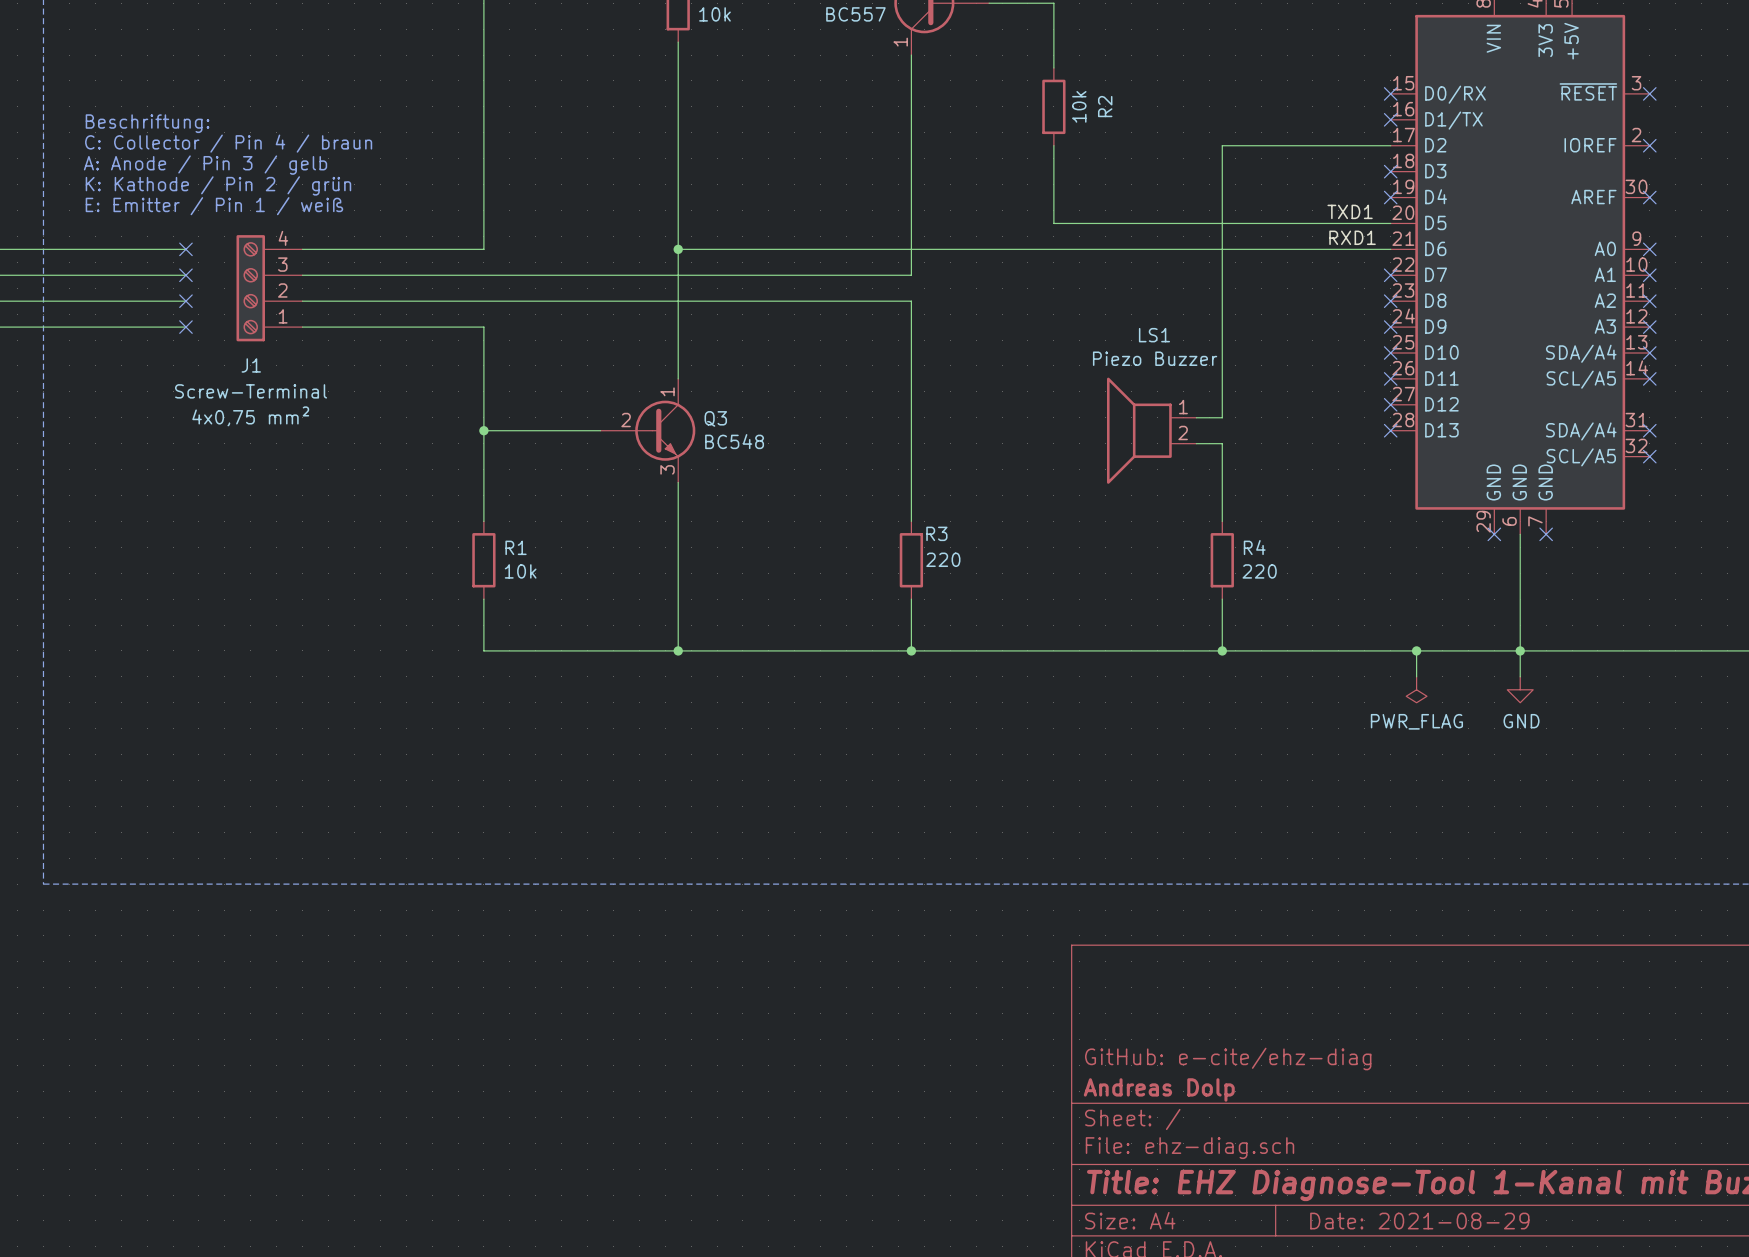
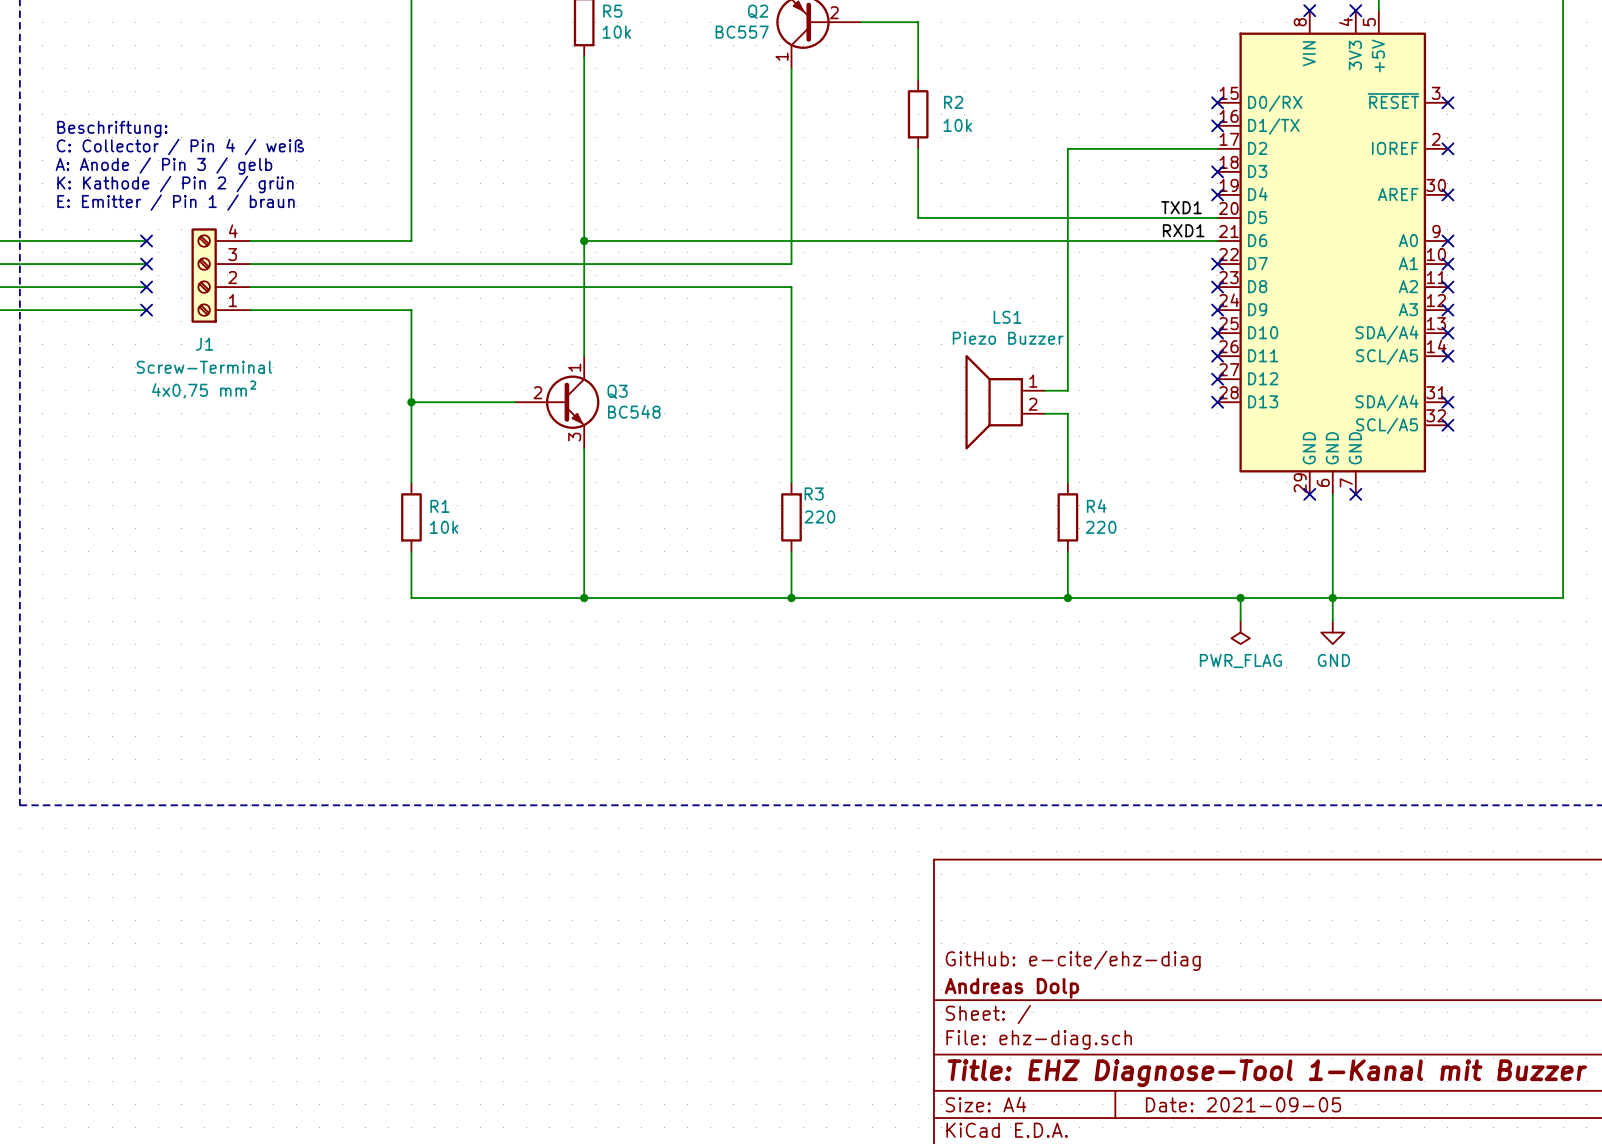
R2 value rotation: 0° (1079, 106) -> 90° clockwise (957, 125)
R2 name rotation: 0° (1105, 106) -> 90° clockwise (953, 102)
text: C: Collector / Pin 4 / braun (228, 143) -> C: Collector / Pin 4 / weiß (180, 146)
text: E: Emitter / Pin 1 / weiß (214, 206) -> E: Emitter / Pin 1 / braun (175, 202)
title block: Date: 2021-08-29 (1419, 1221) -> Date: 2021-09-05 (1243, 1104)

